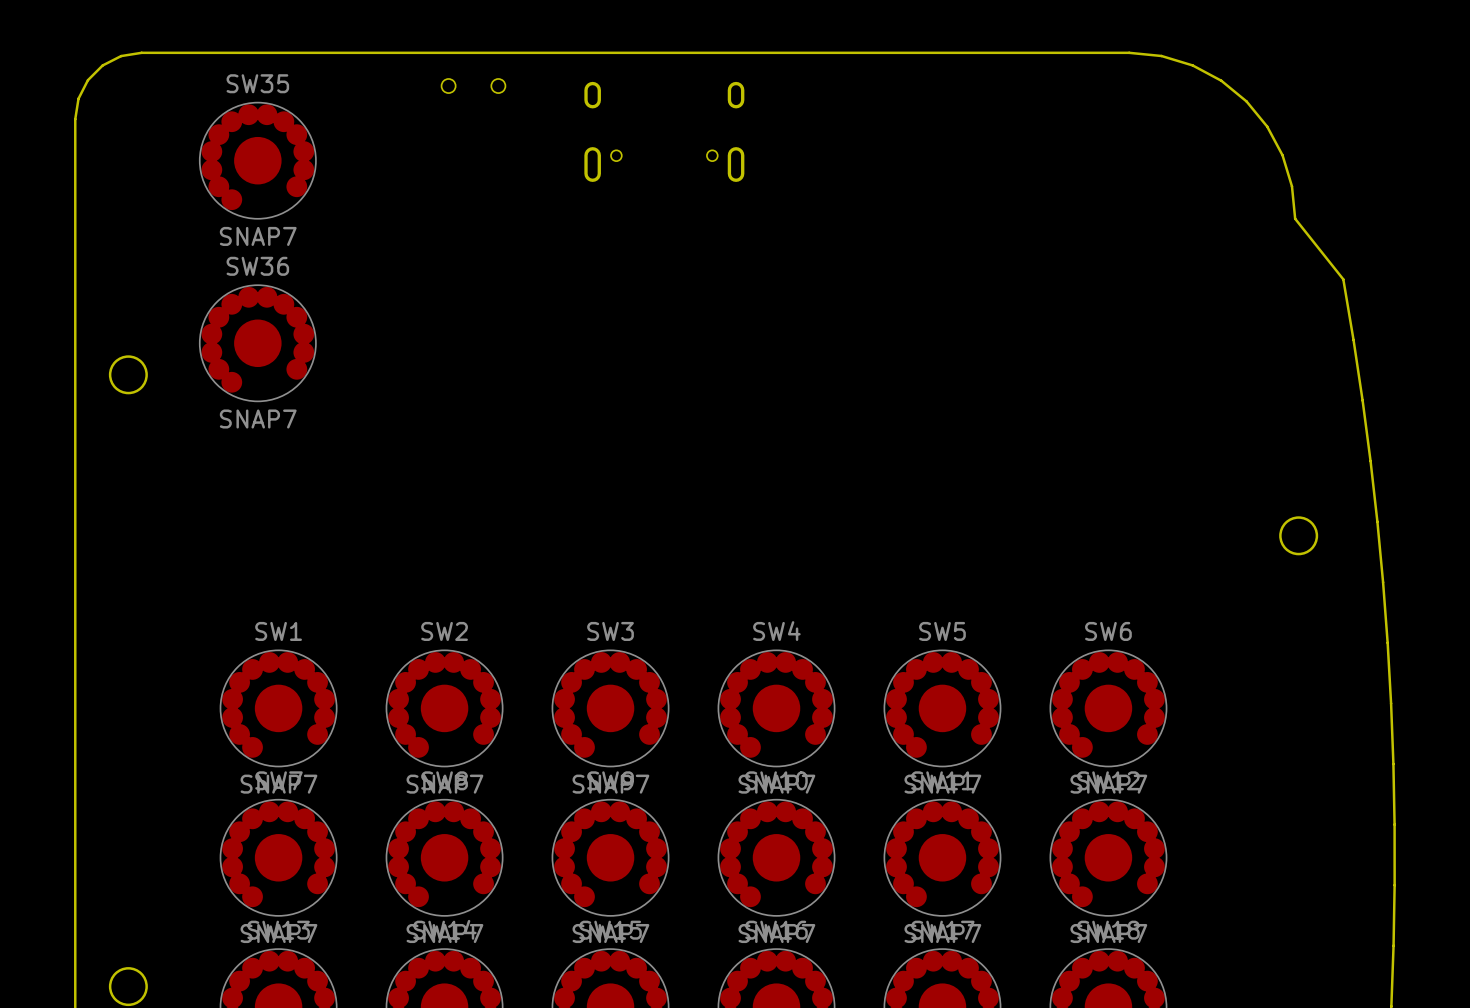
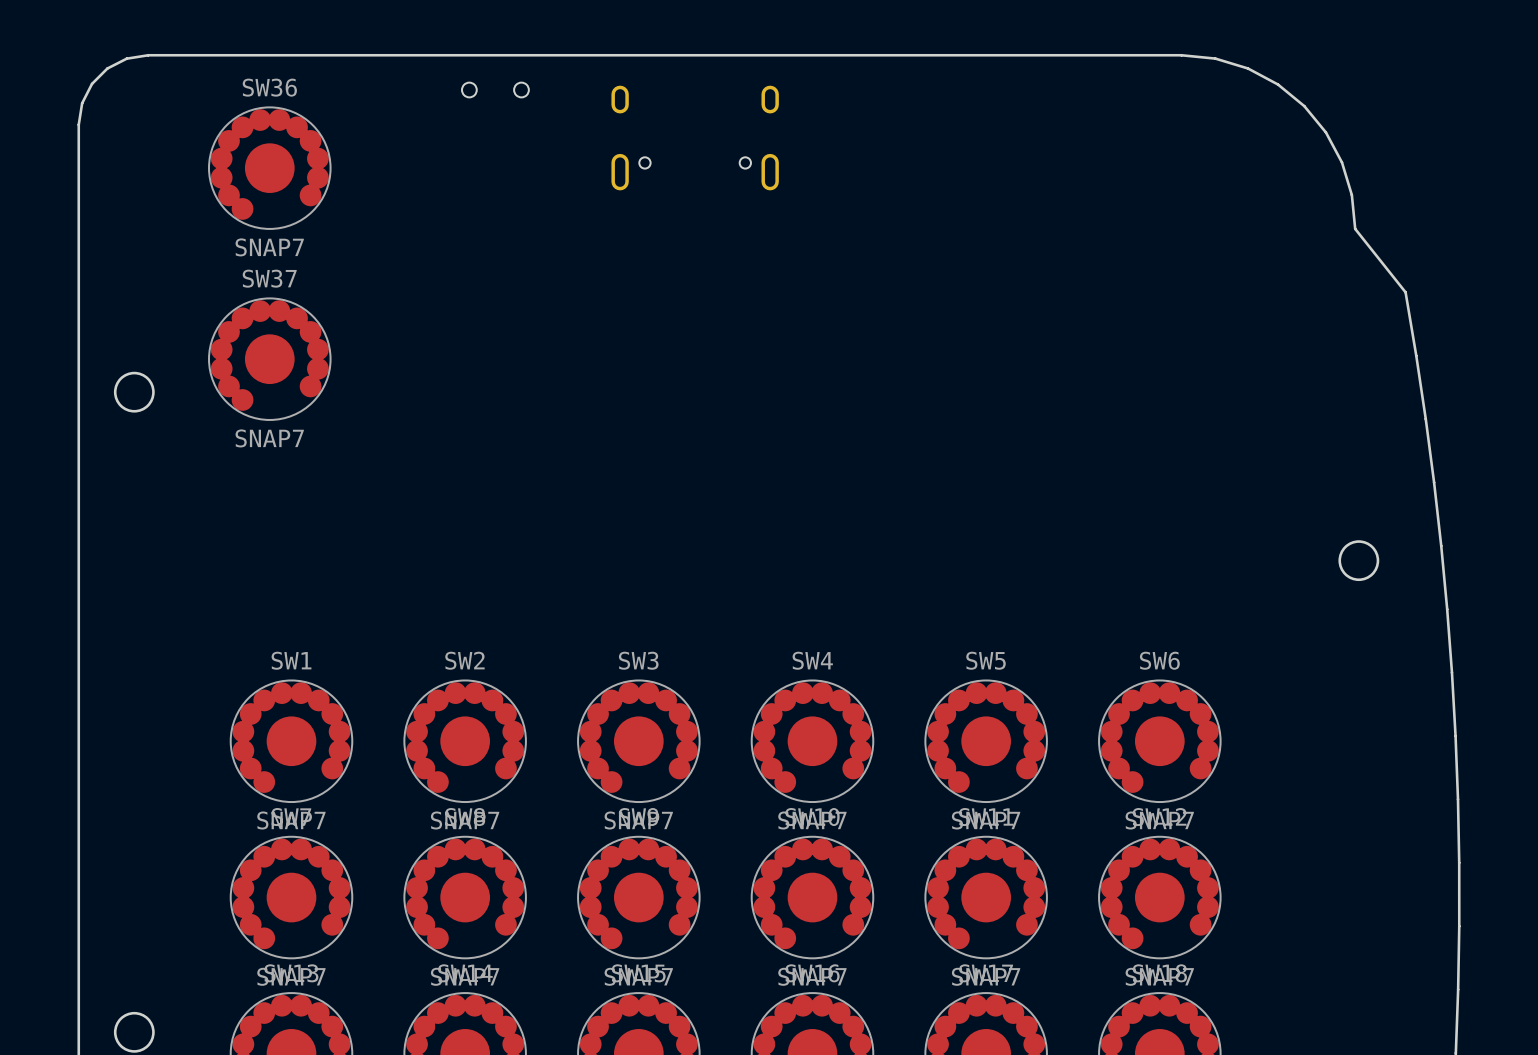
SW35 name: SW35 (257, 83) -> SW36 (269, 87)
SW36 name: SW36 (257, 266) -> SW37 (269, 278)

